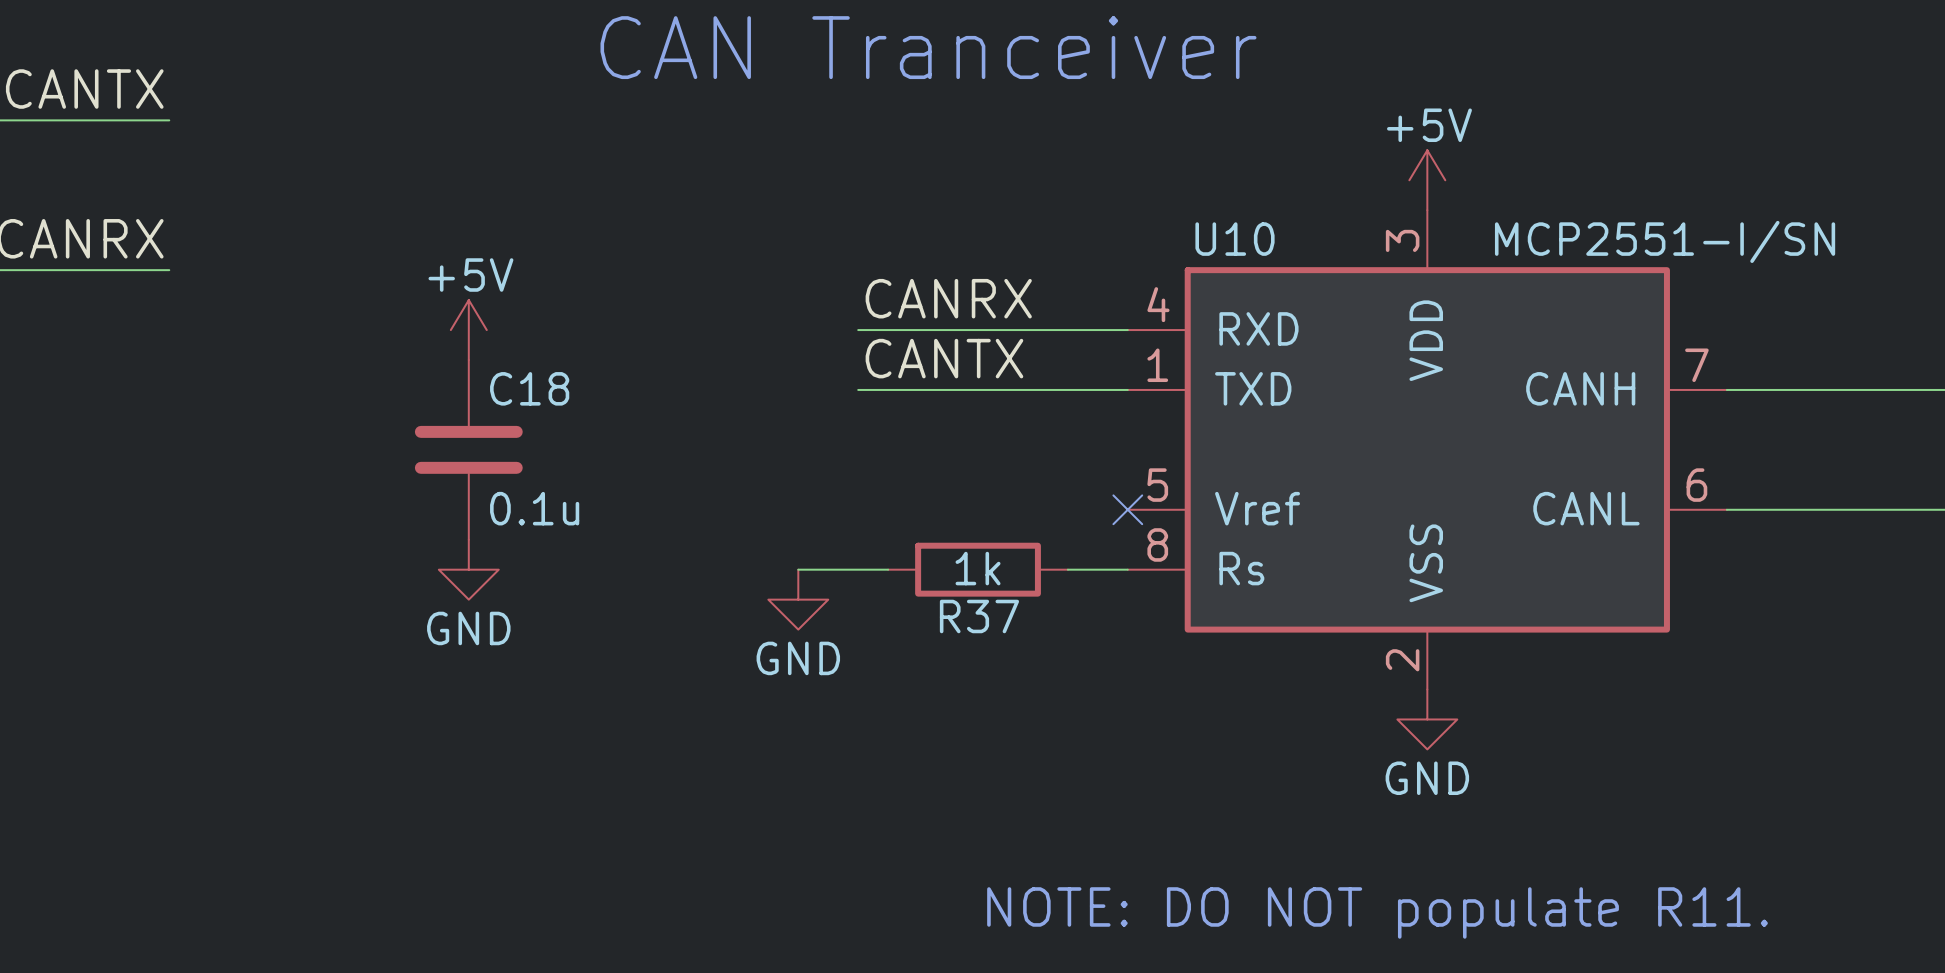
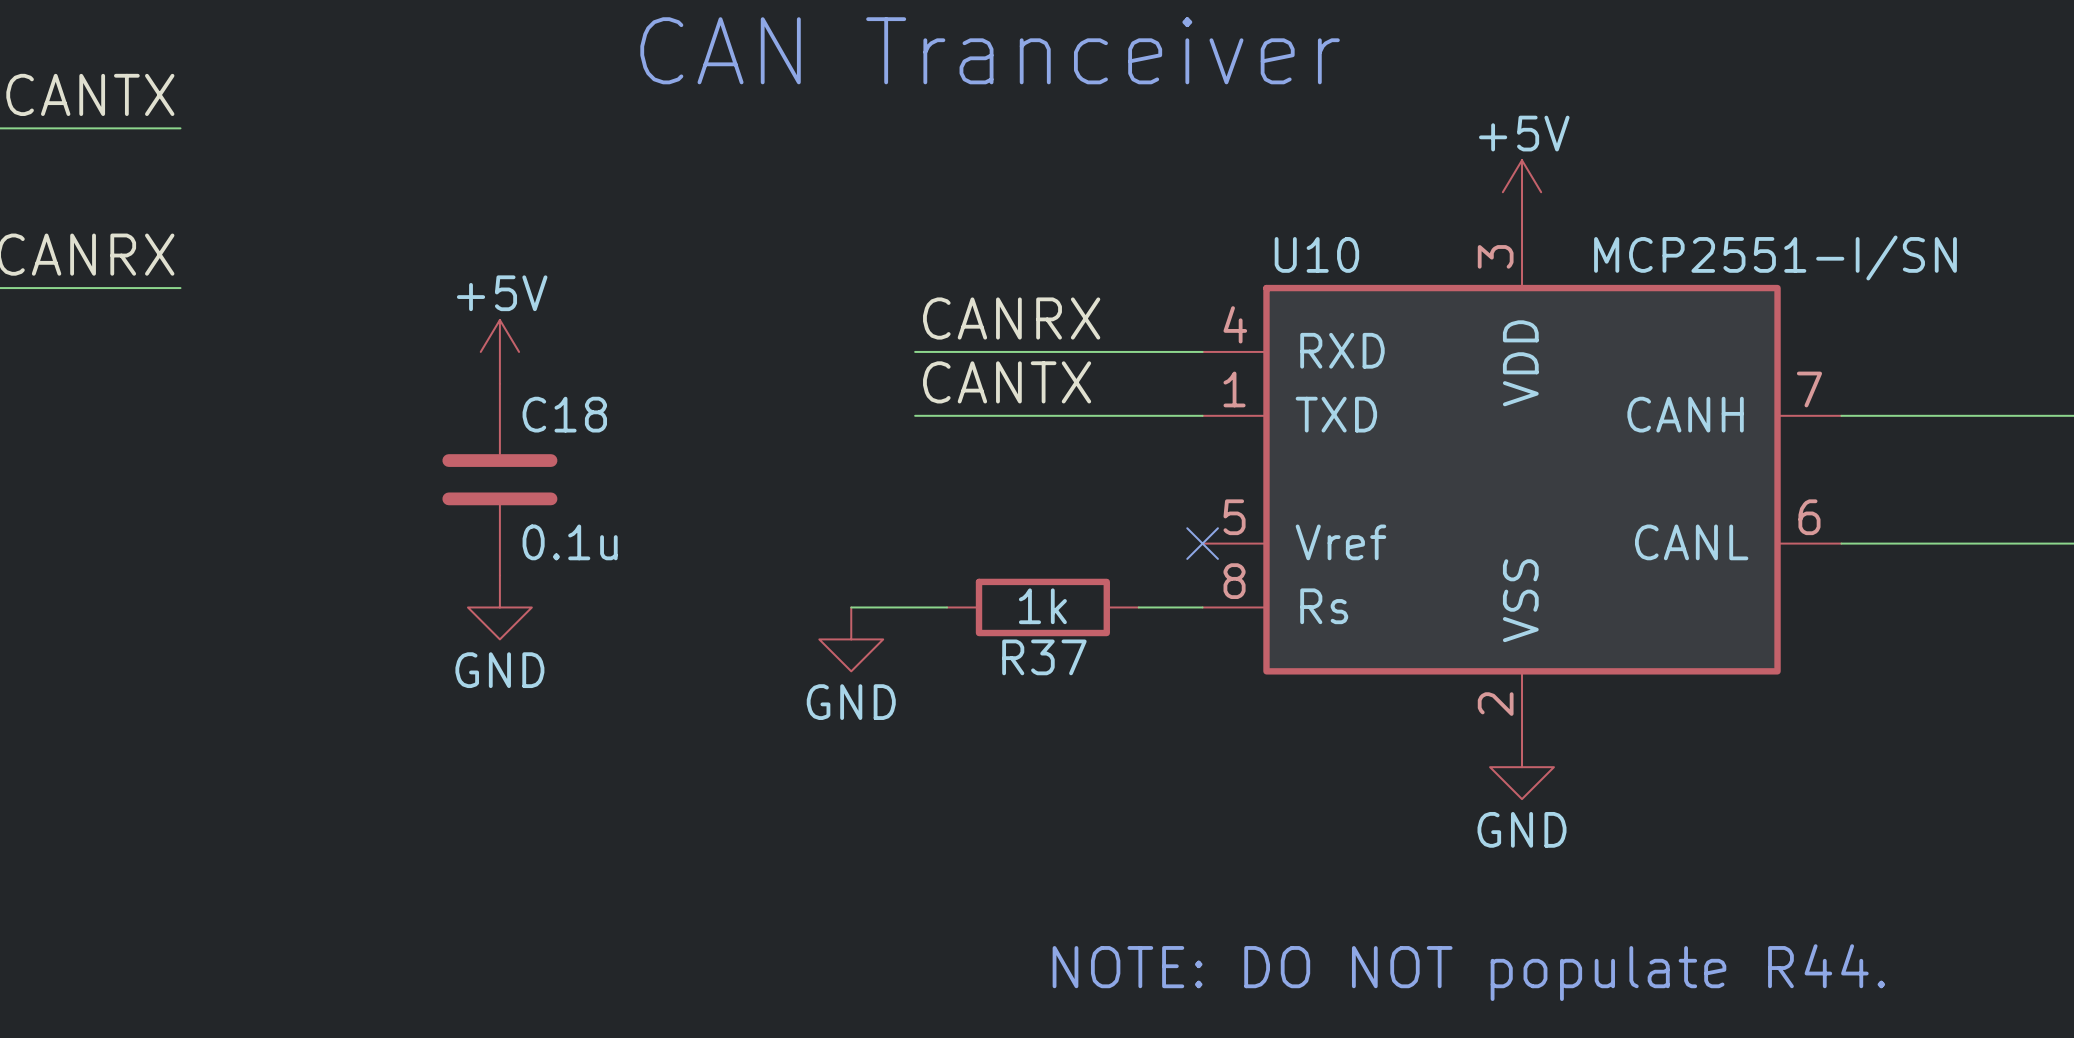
text: NOTE: DO NOT populate R11. (1377, 912) -> NOTE: DO NOT populate R44. (1468, 972)

